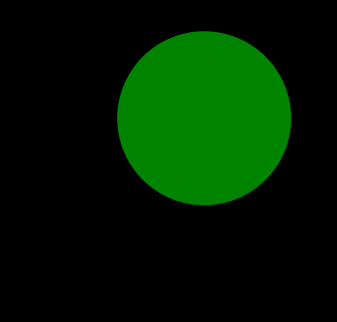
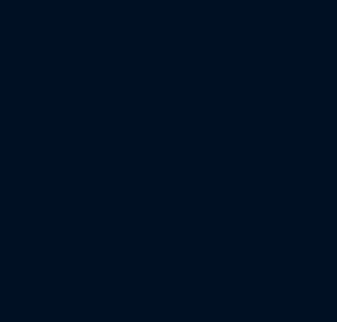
drawing: [117, 31, 292, 206] -> none

